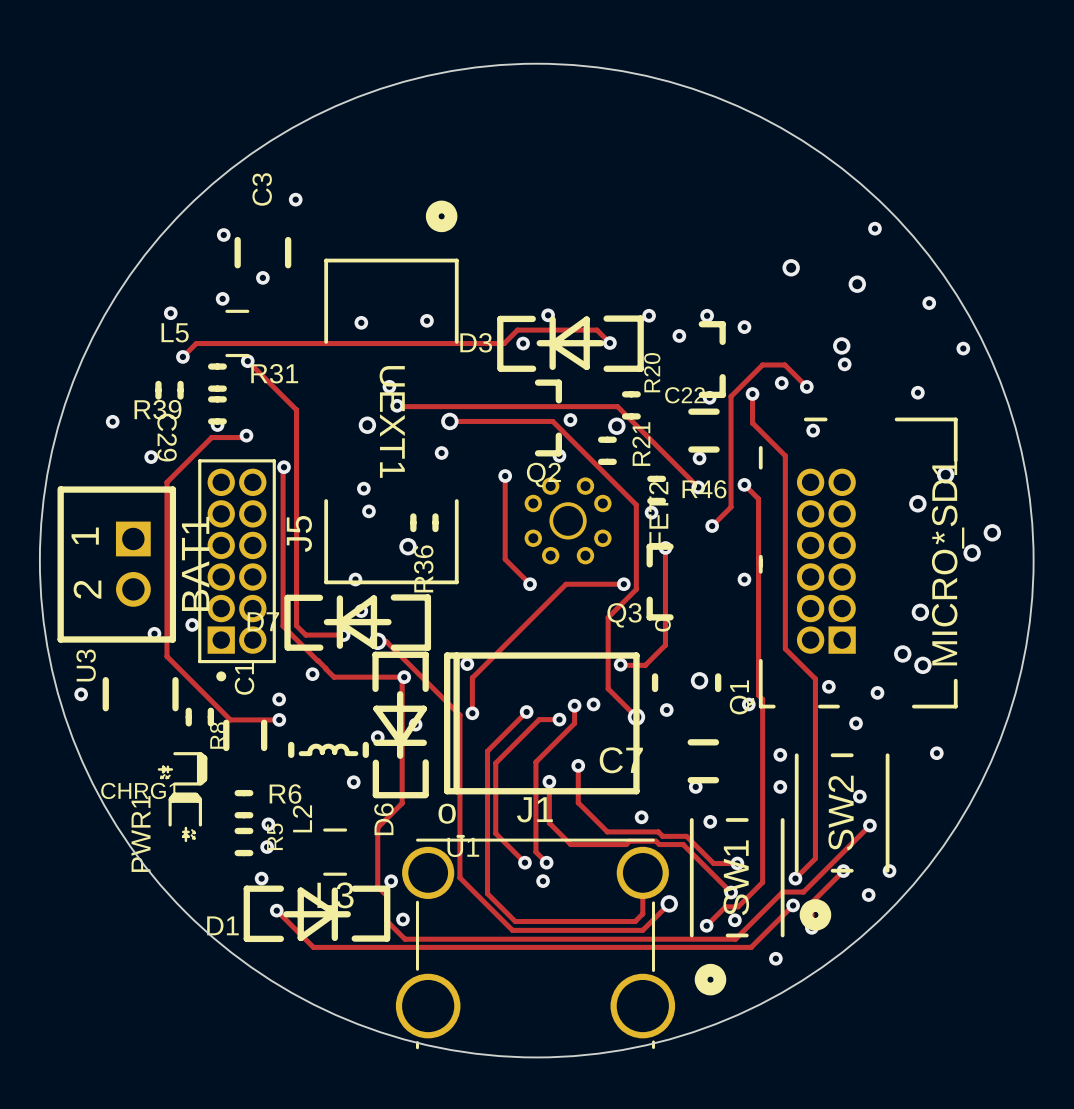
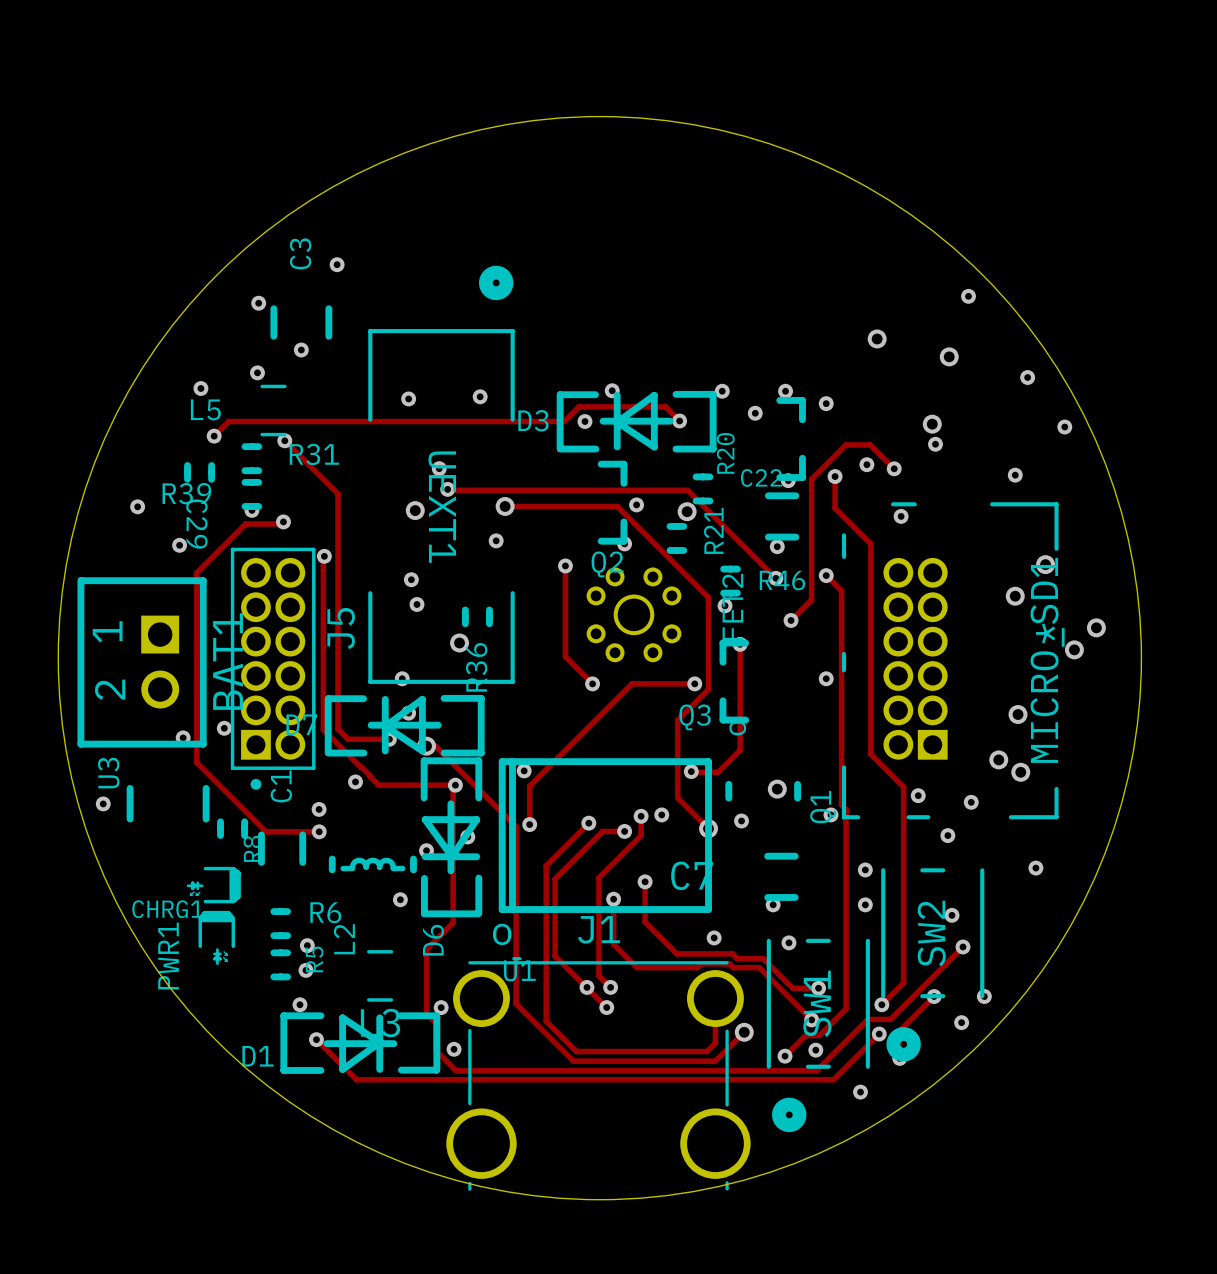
track: (495, 833) (524, 862) -> (555, 955) (606, 1007)

